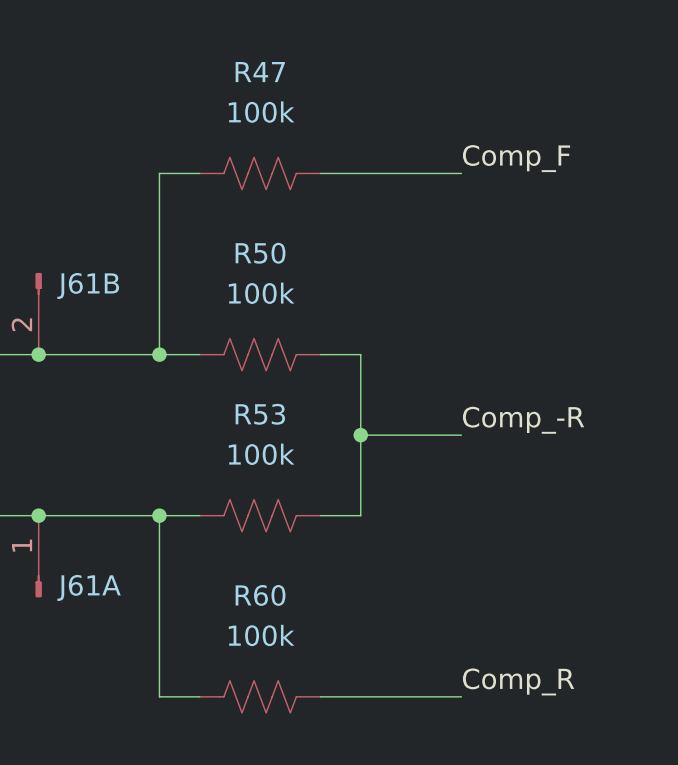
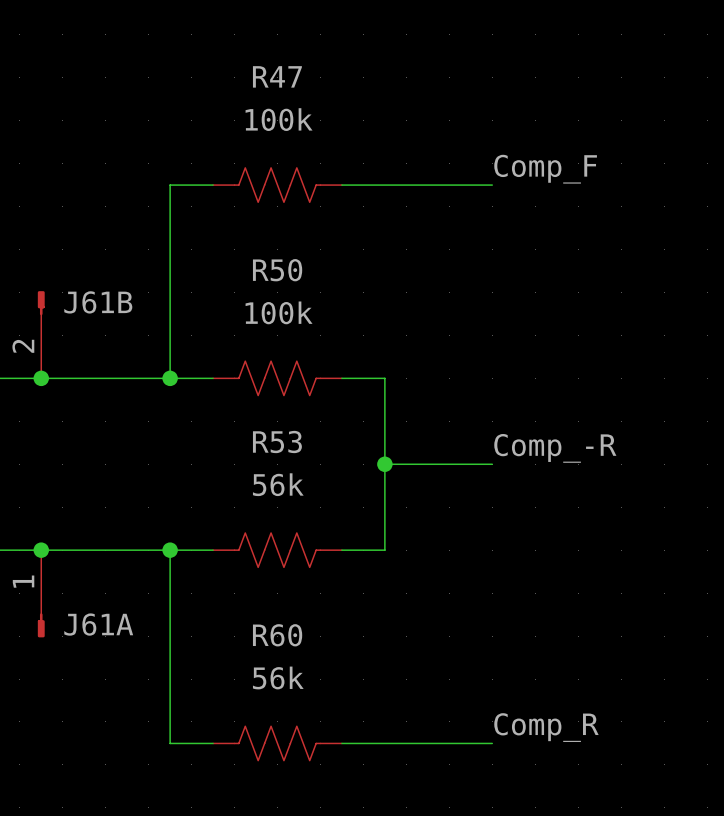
R53 value: 100k (261, 454) -> 56k (278, 484)
R60 value: 100k (261, 635) -> 56k (278, 677)

